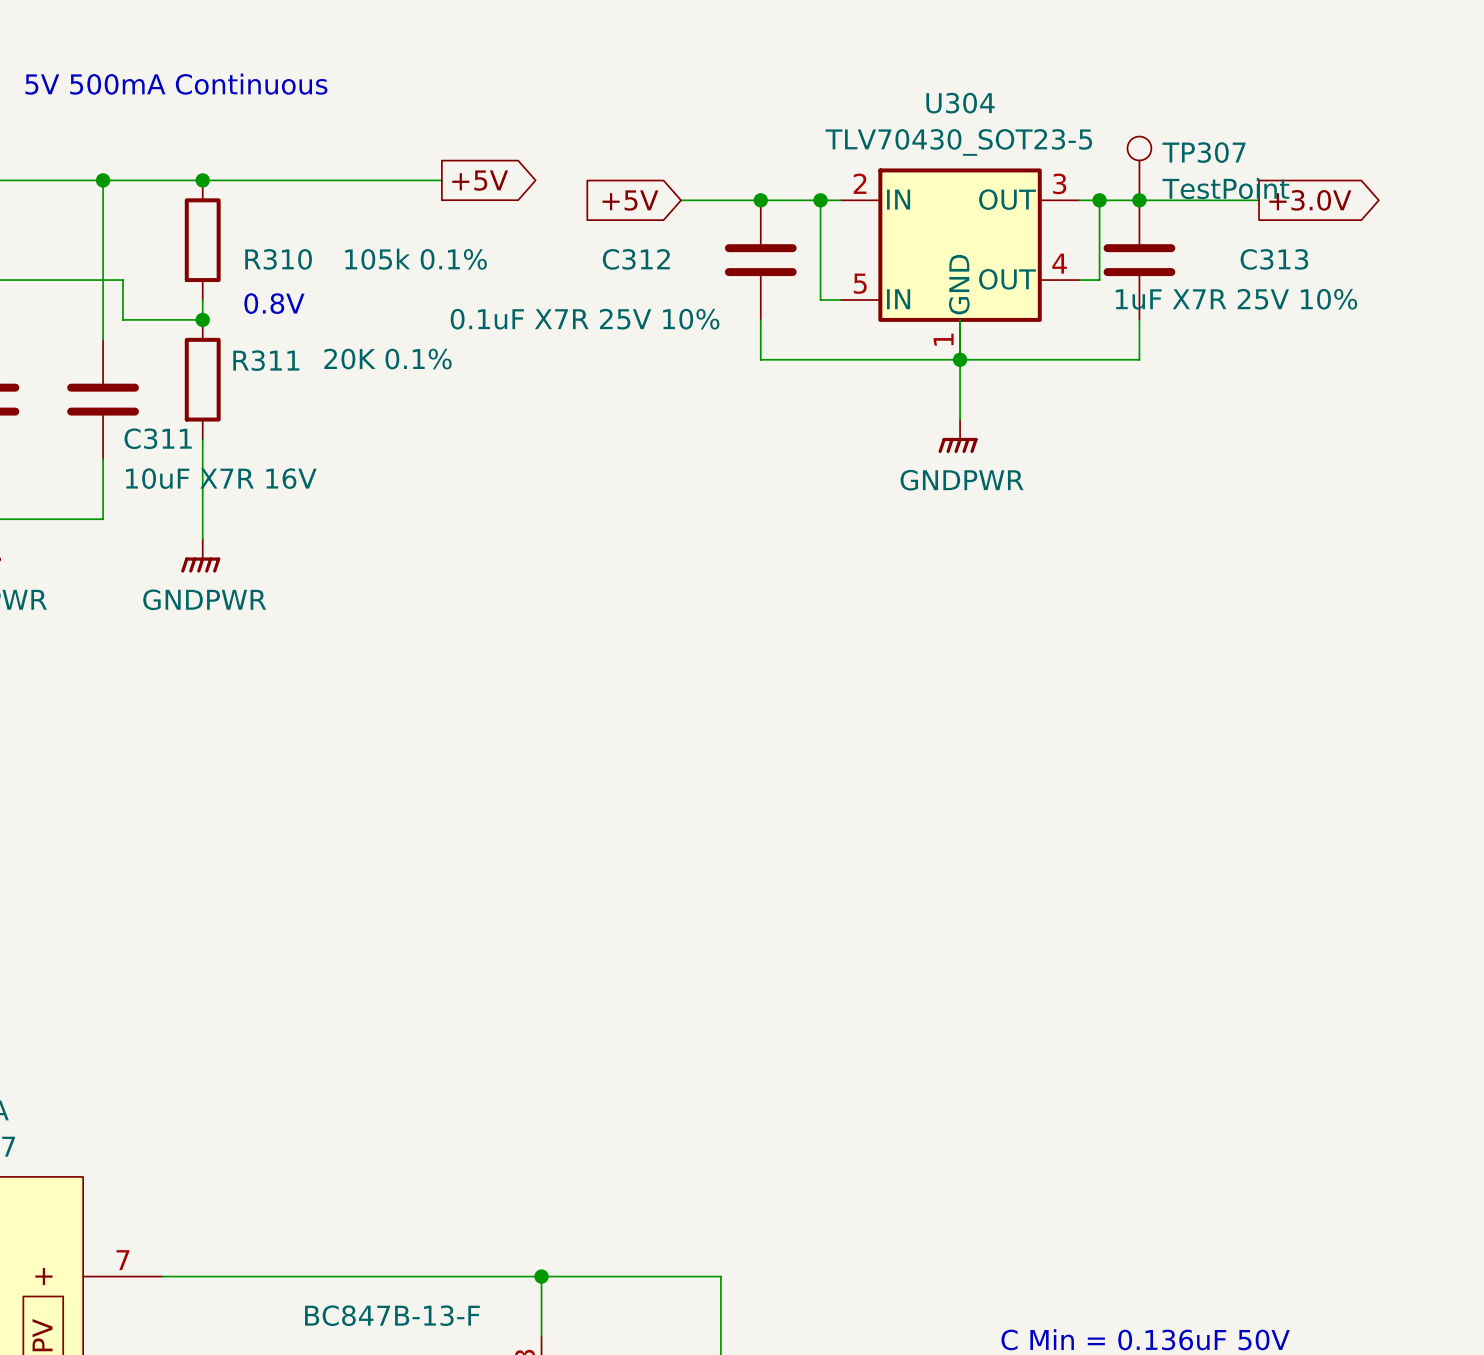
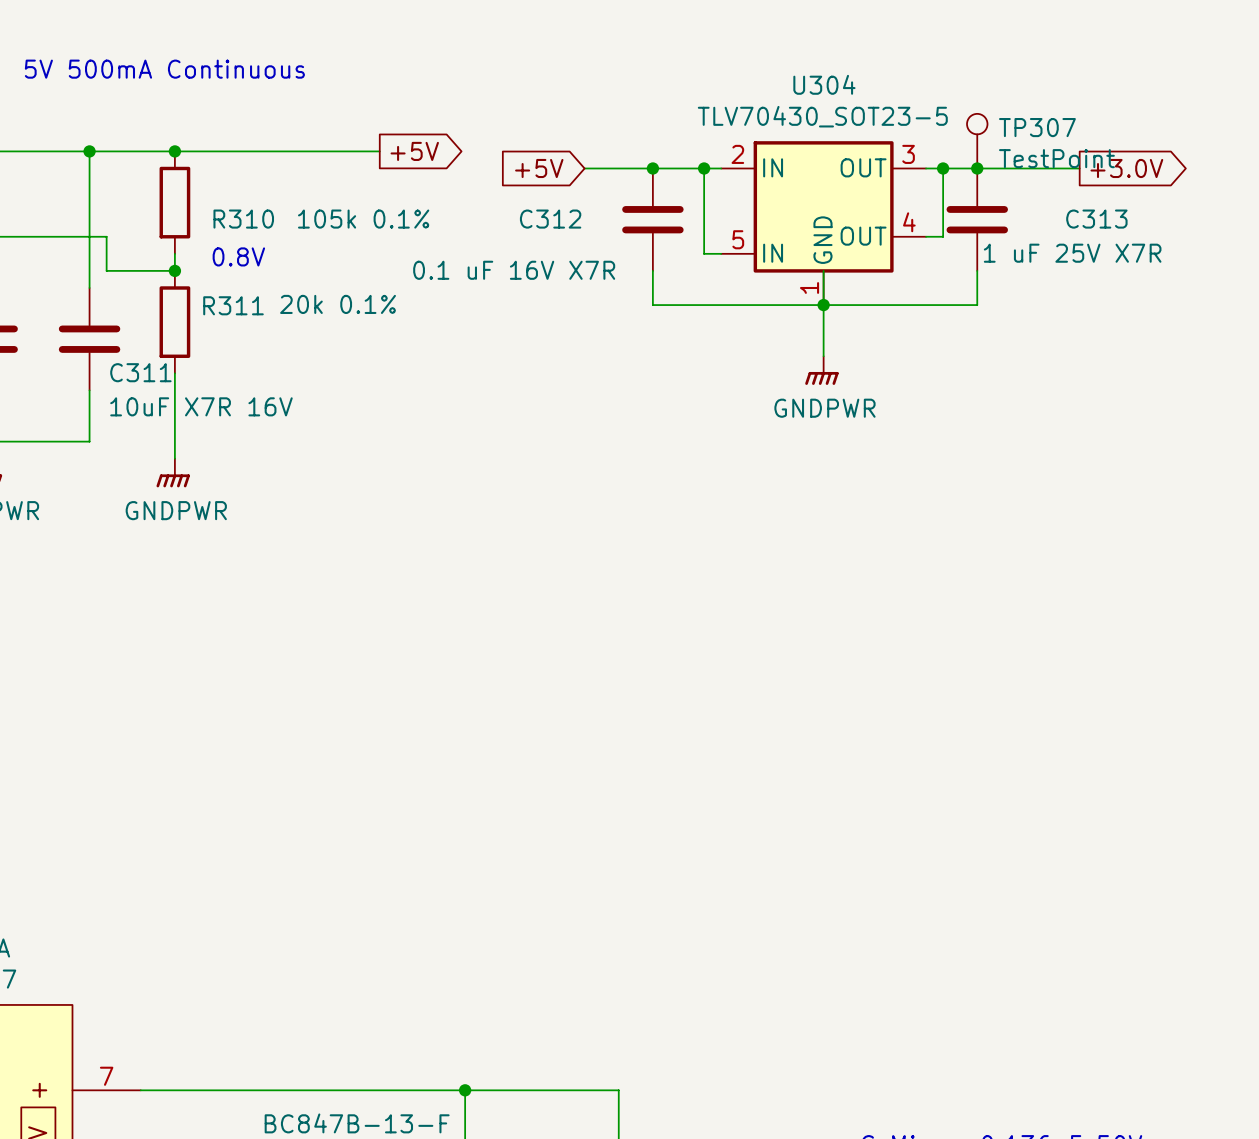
C313 value: 1uF X7R 25V 10% (1236, 299) -> 1 uF 25V X7R (1072, 253)
C312 value: 0.1uF X7R 25V 10% (585, 319) -> 0.1 uF 16V X7R (514, 270)
R311 value: 20K 0.1% (387, 359) -> 20k 0.1% (338, 304)

